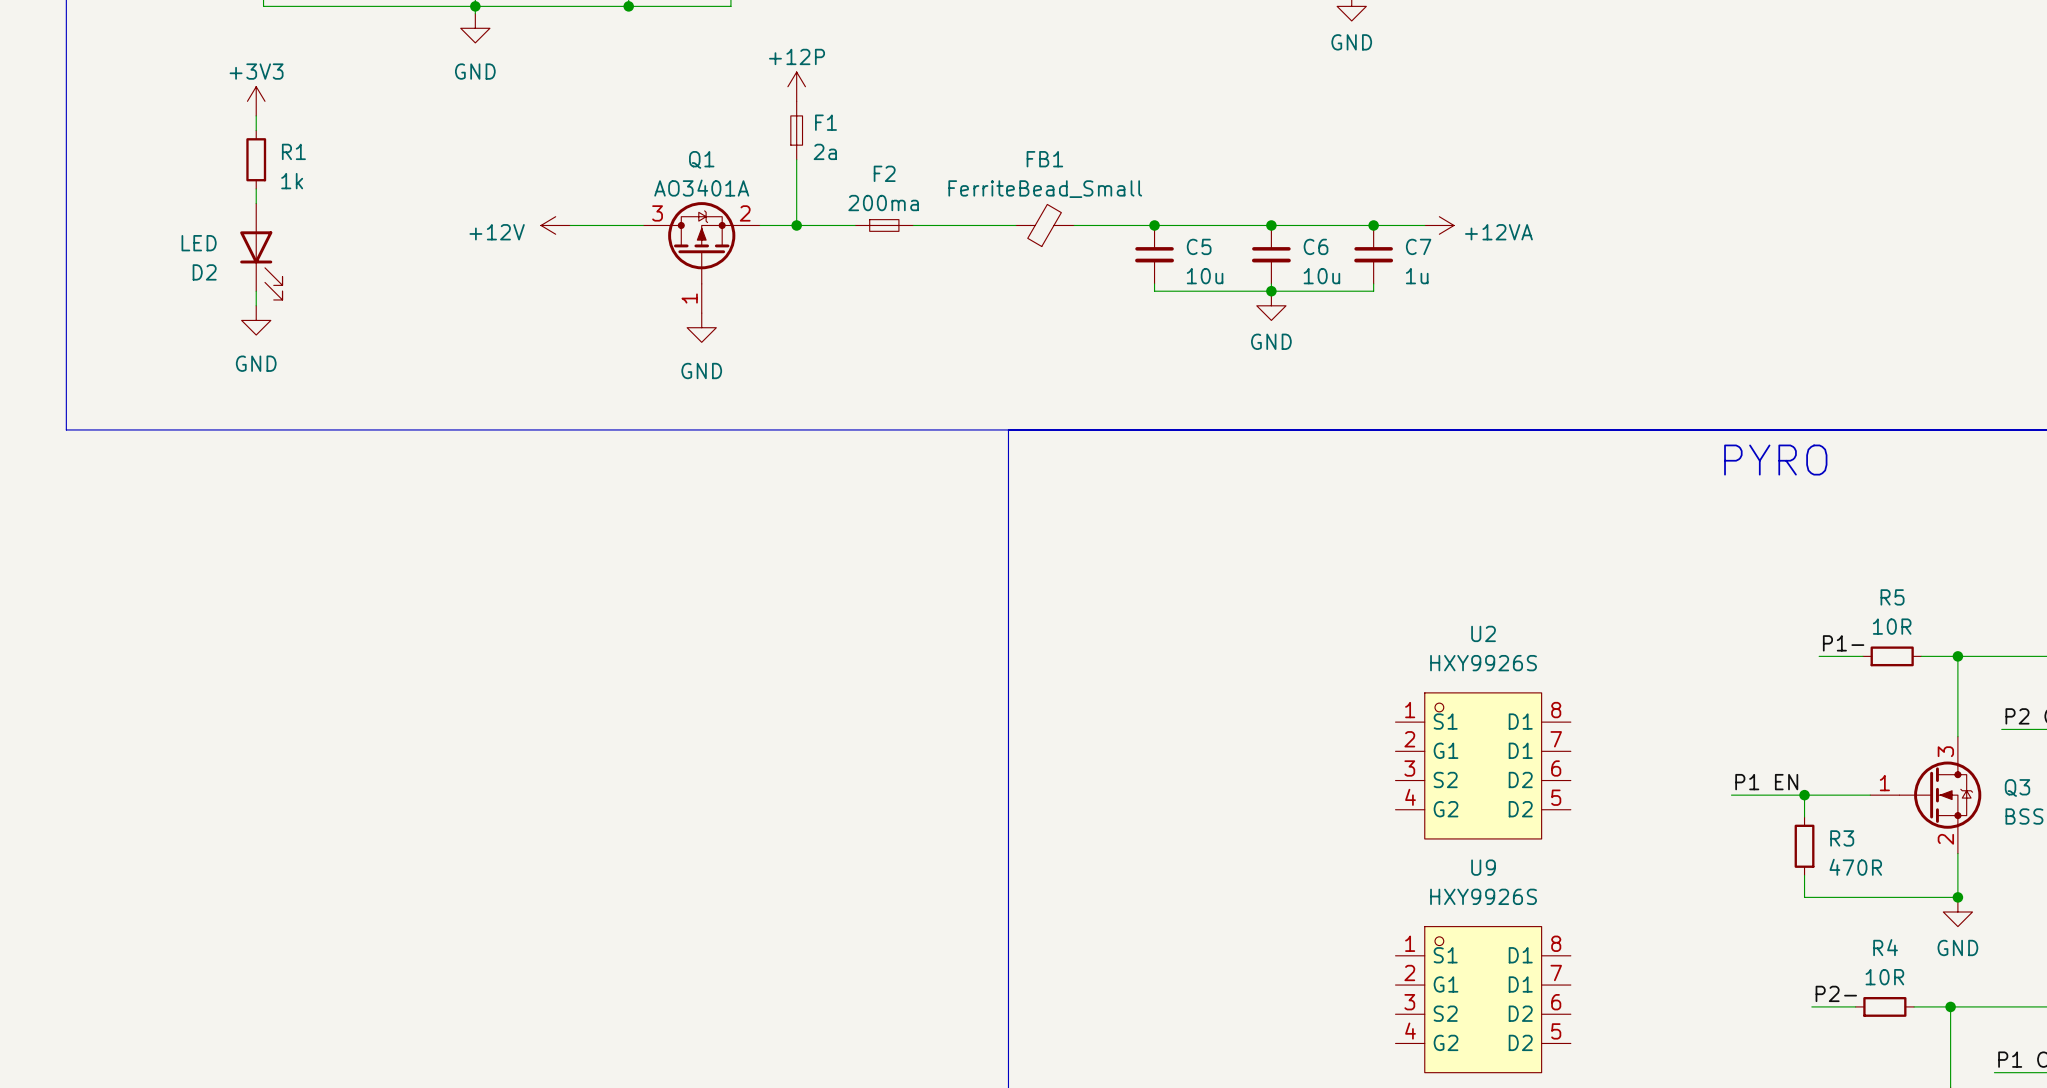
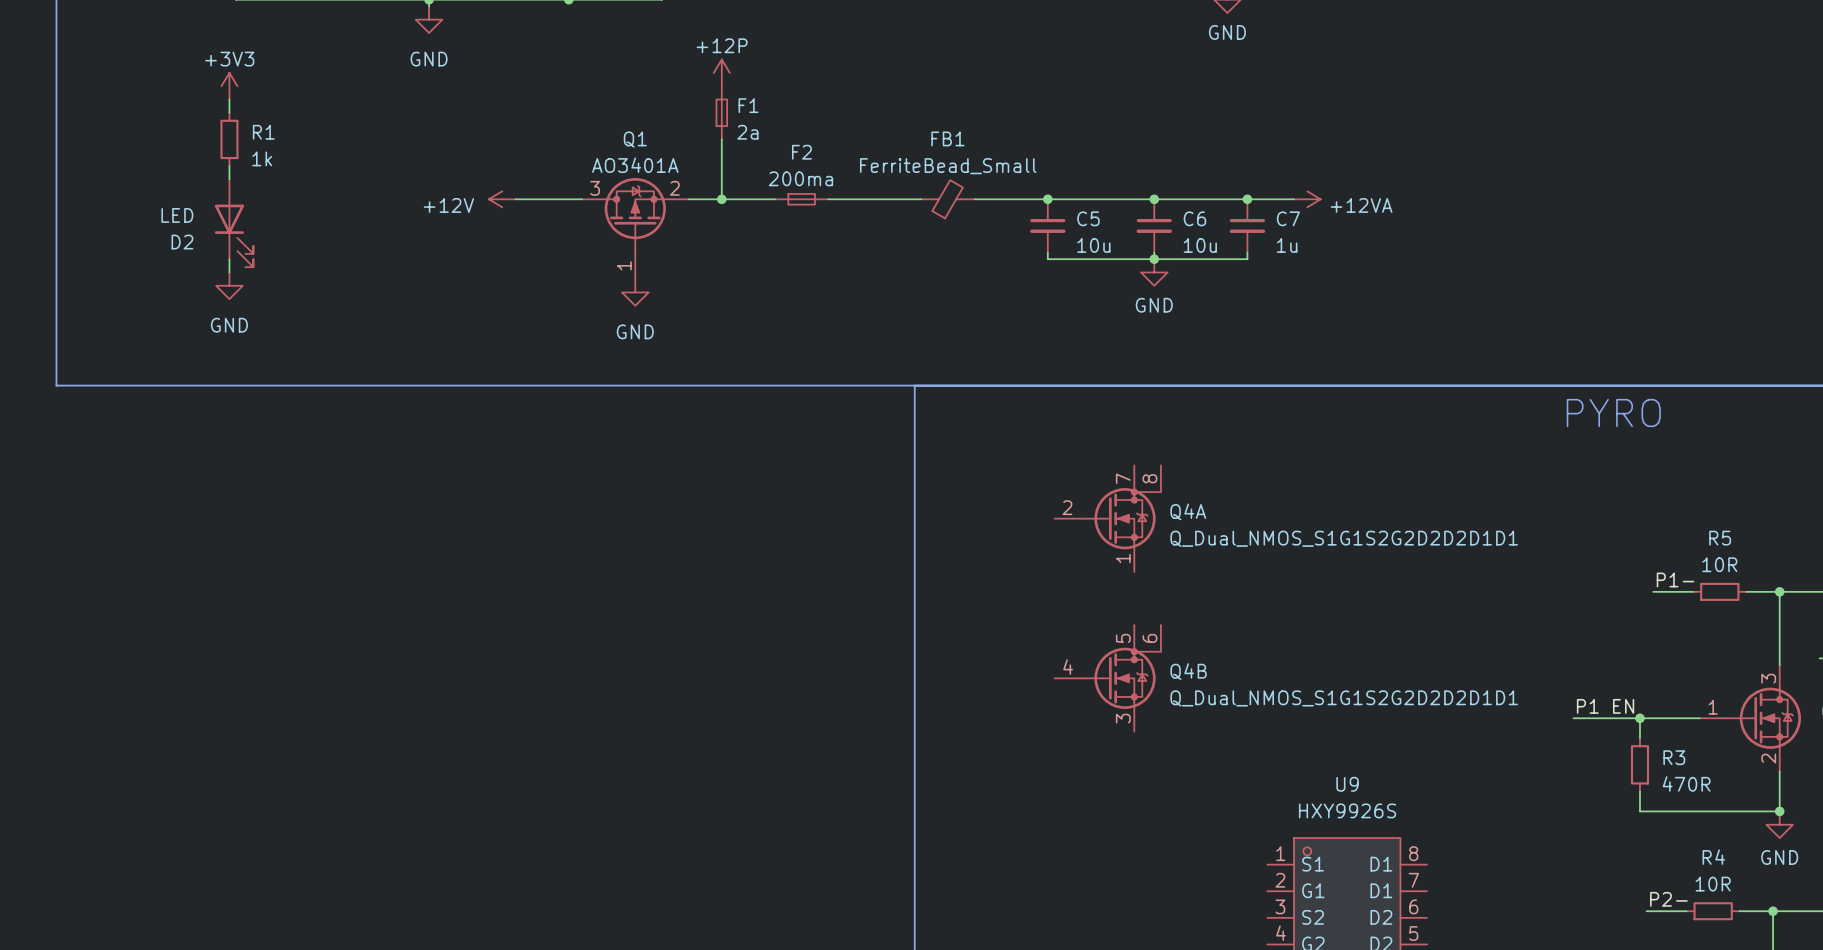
Q4A: none -> Q_Dual_NMOS_S1G1S2G2D2D2D1D1 (1107, 518)
Q4B: none -> Q_Dual_NMOS_S1G1S2G2D2D2D1D1 (1107, 678)
U2: HXY9926S (1483, 765) -> none

